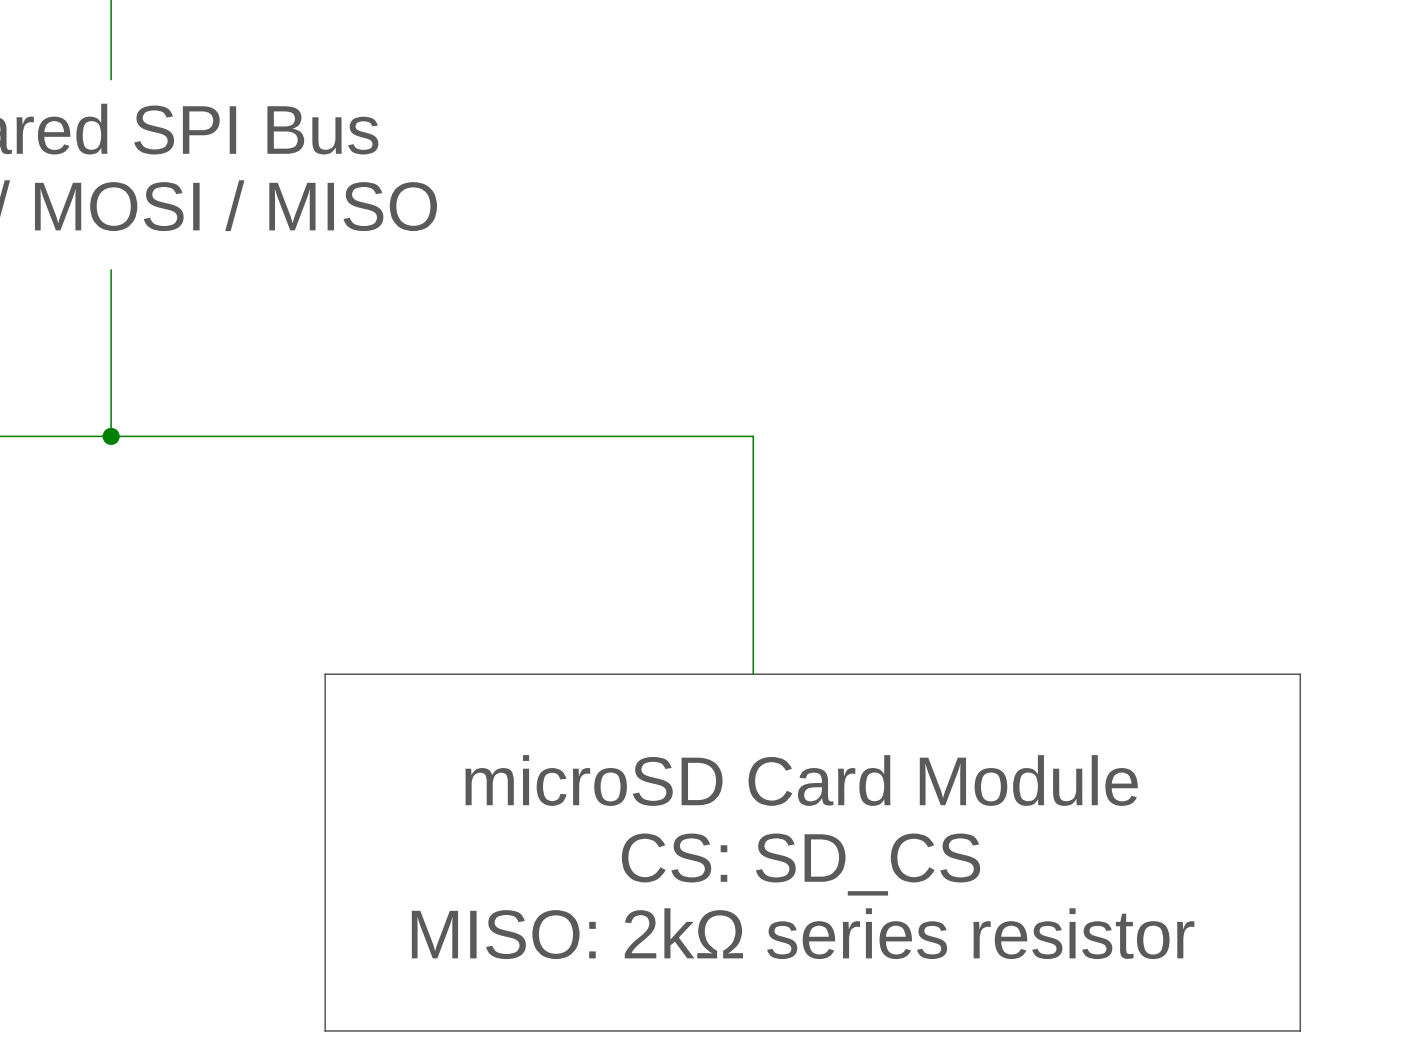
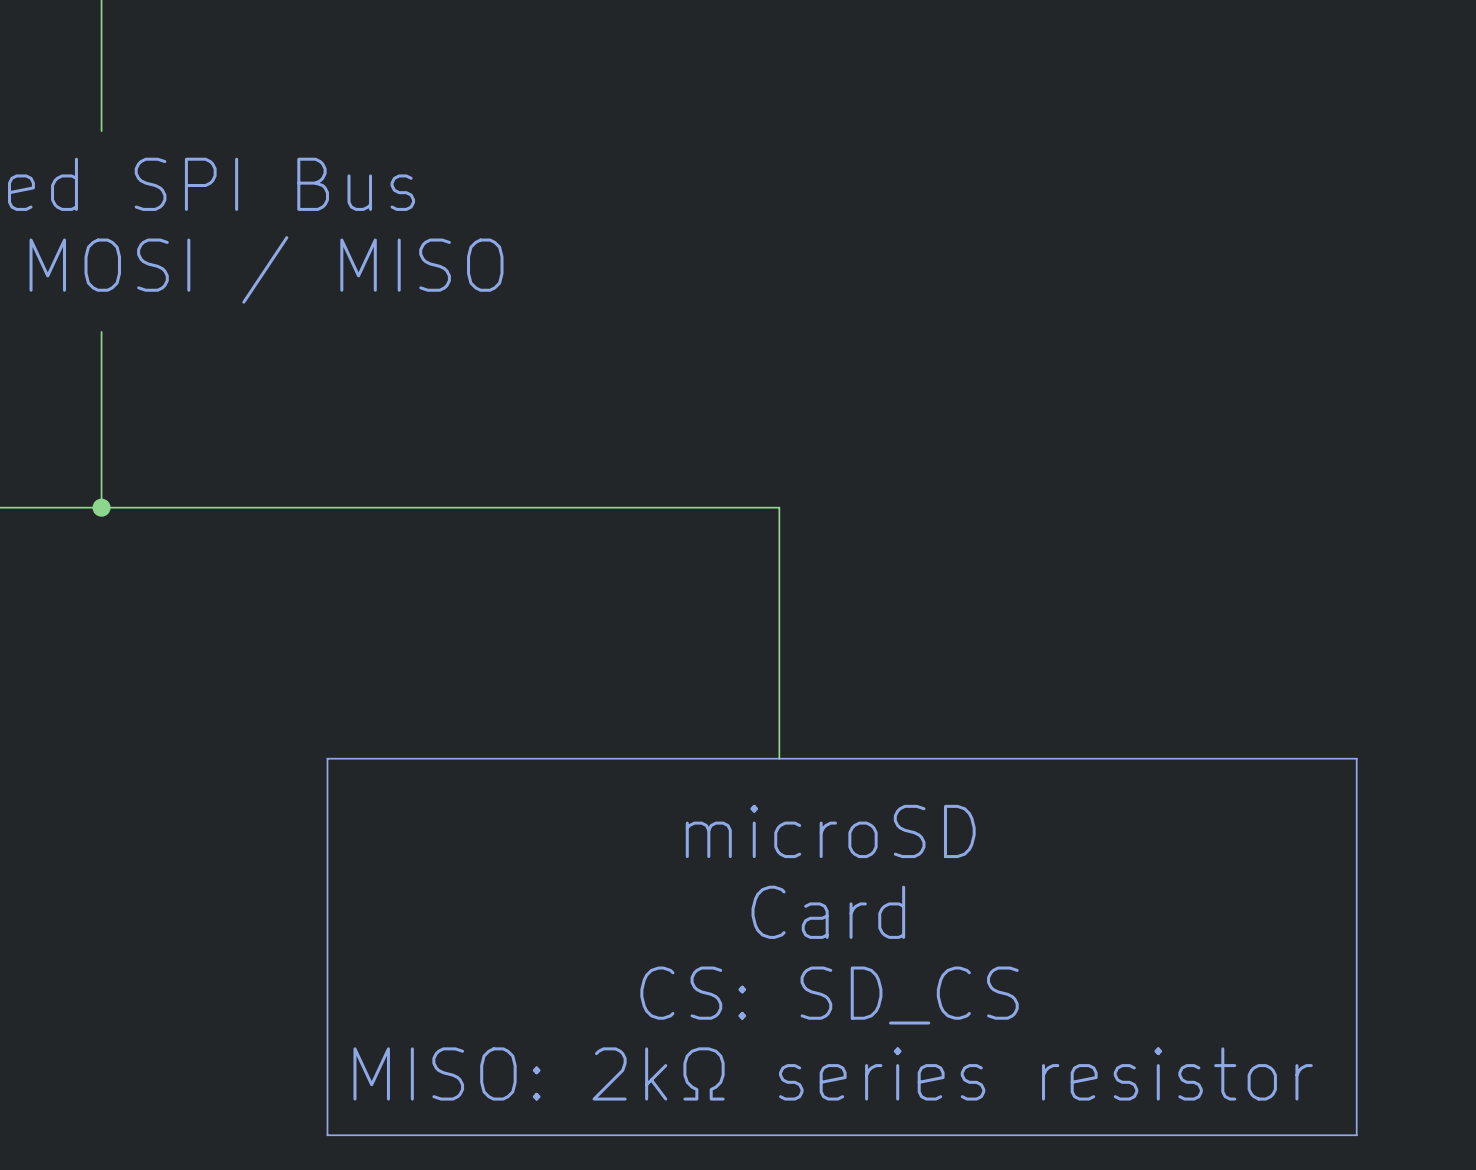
text: none -> microSD (830, 831)
text: microSD Card Module (801, 780) -> none
text: none -> Card (828, 912)
text position: CS: SD_CS (801, 864) -> CS: SD_CS (829, 995)
text position: MISO: 2kΩ series resistor (803, 933) -> MISO: 2kΩ series resistor (833, 1073)

